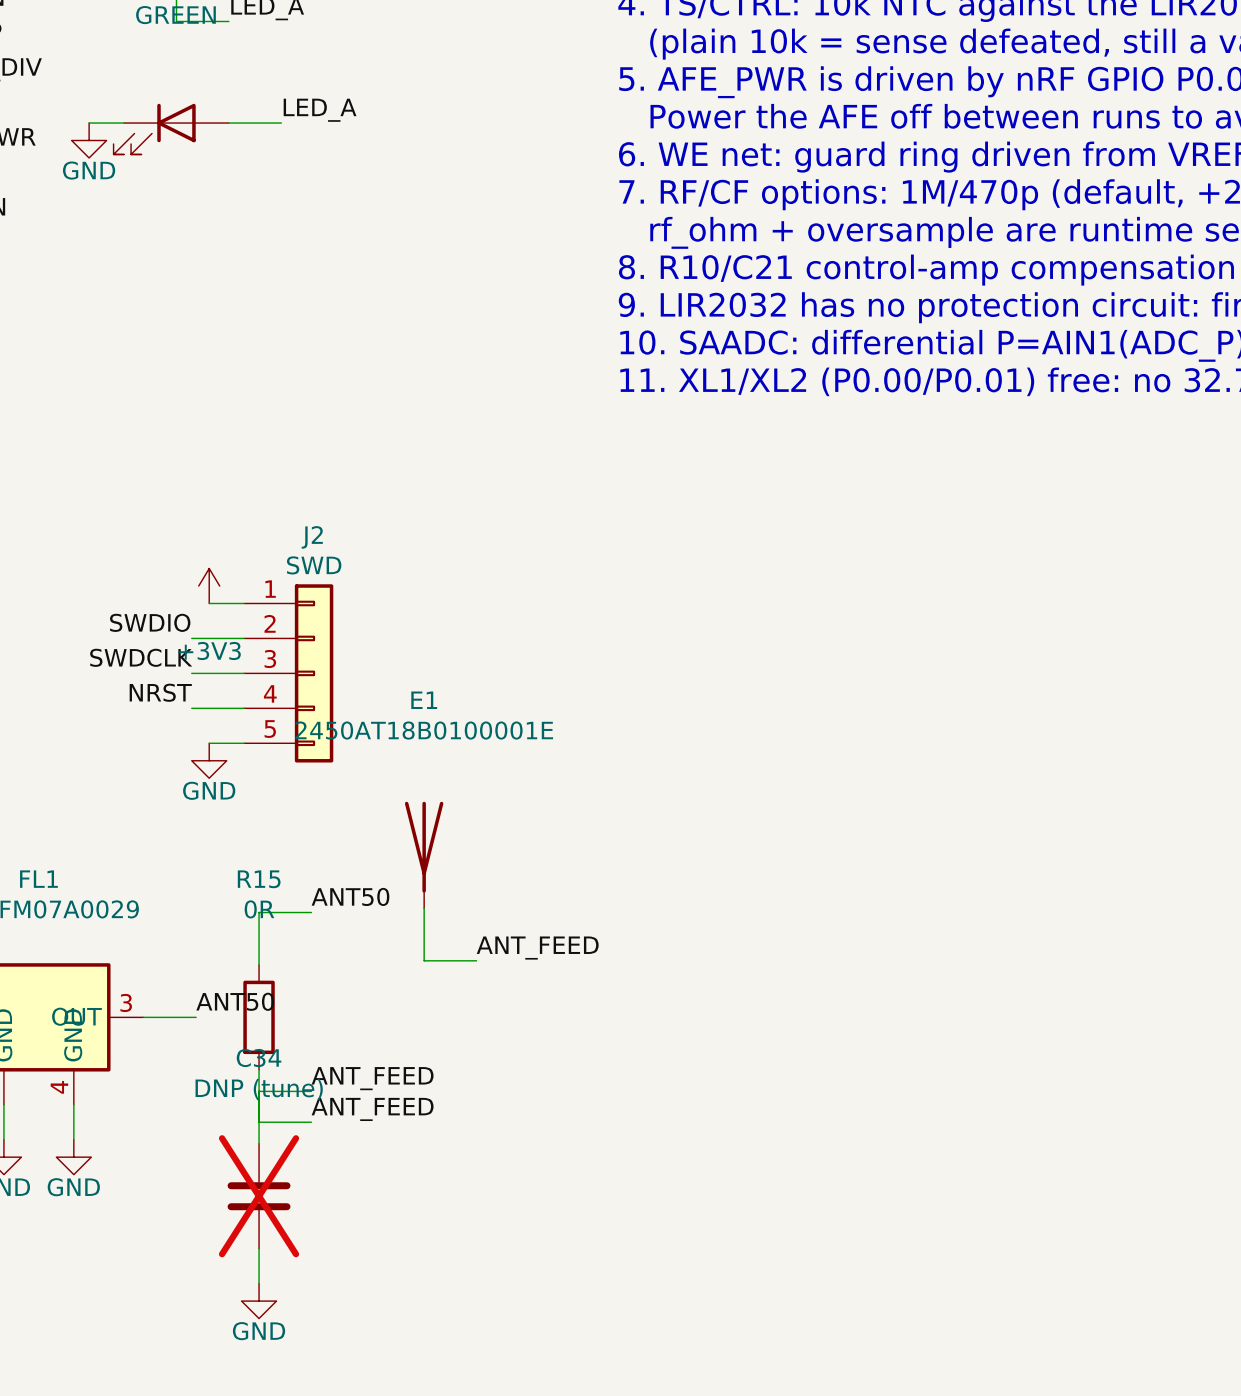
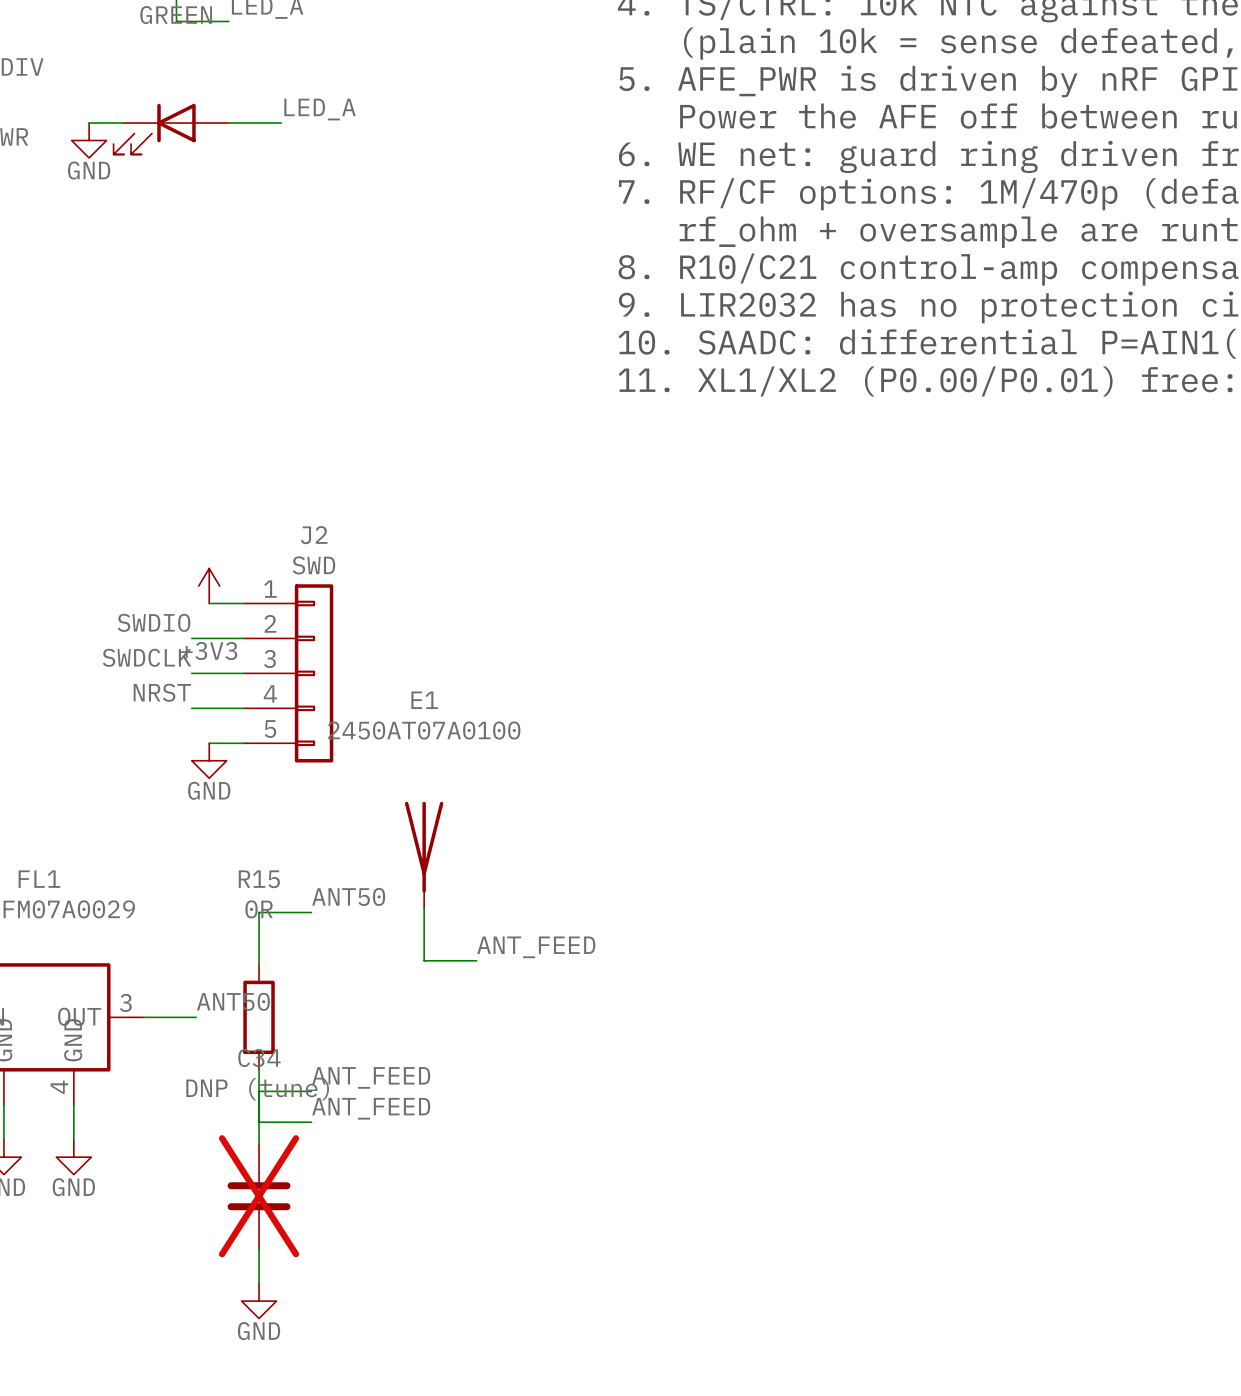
E1 value: 2450AT18B0100001E (424, 730) -> 2450AT07A0100 (424, 730)

